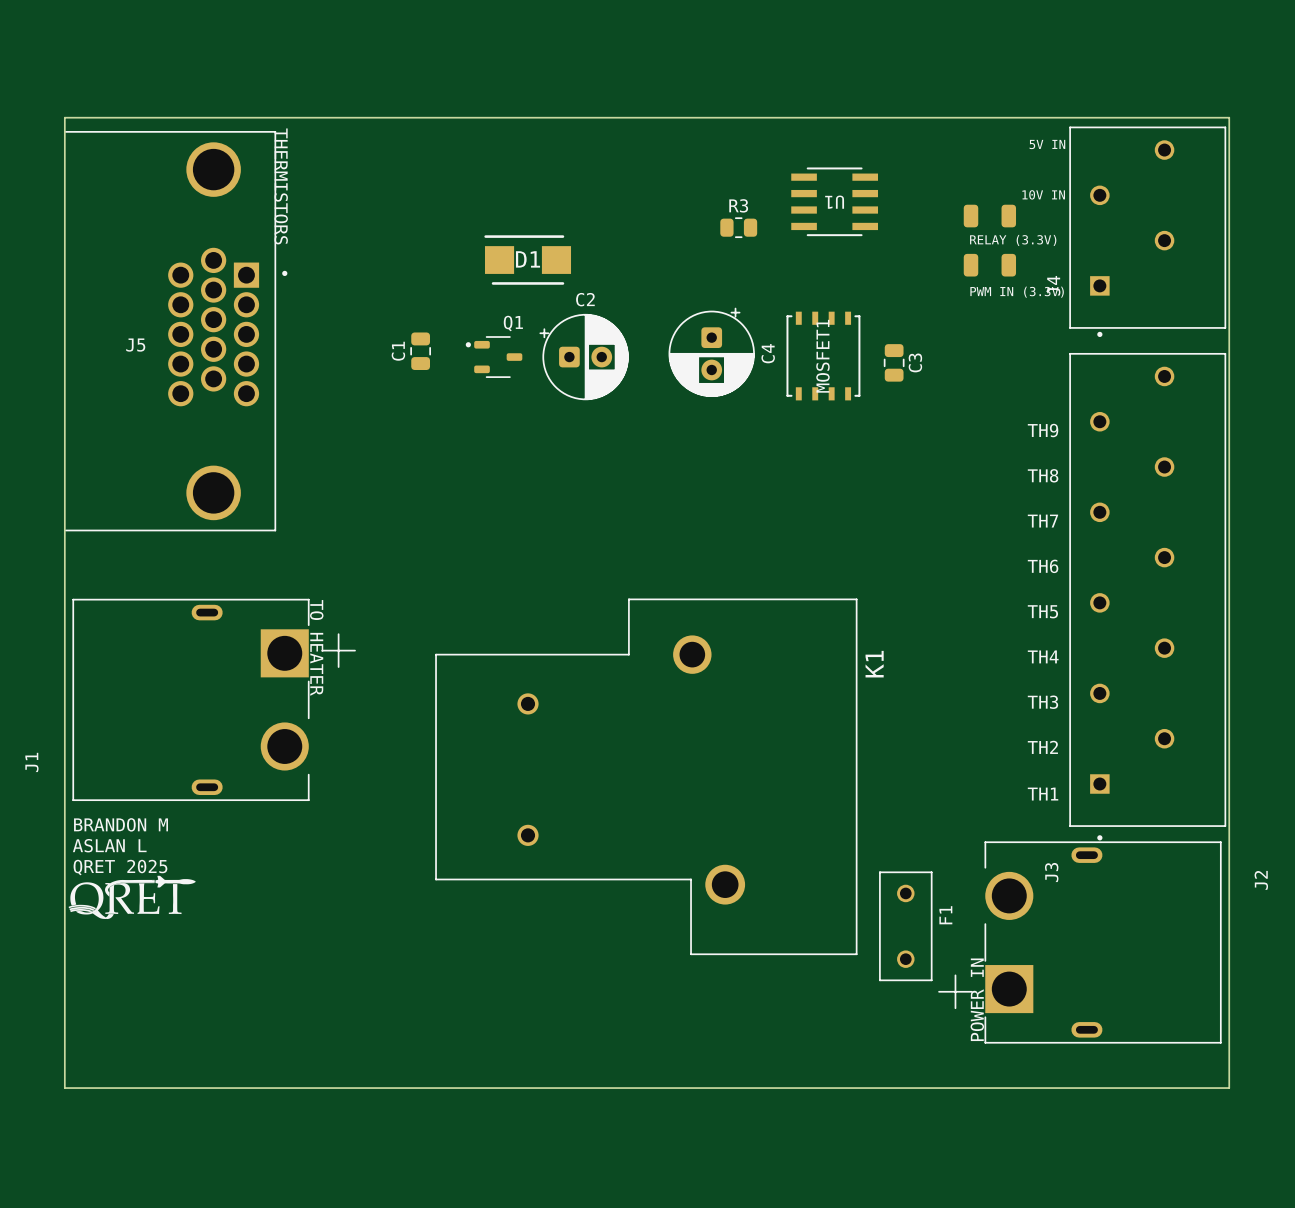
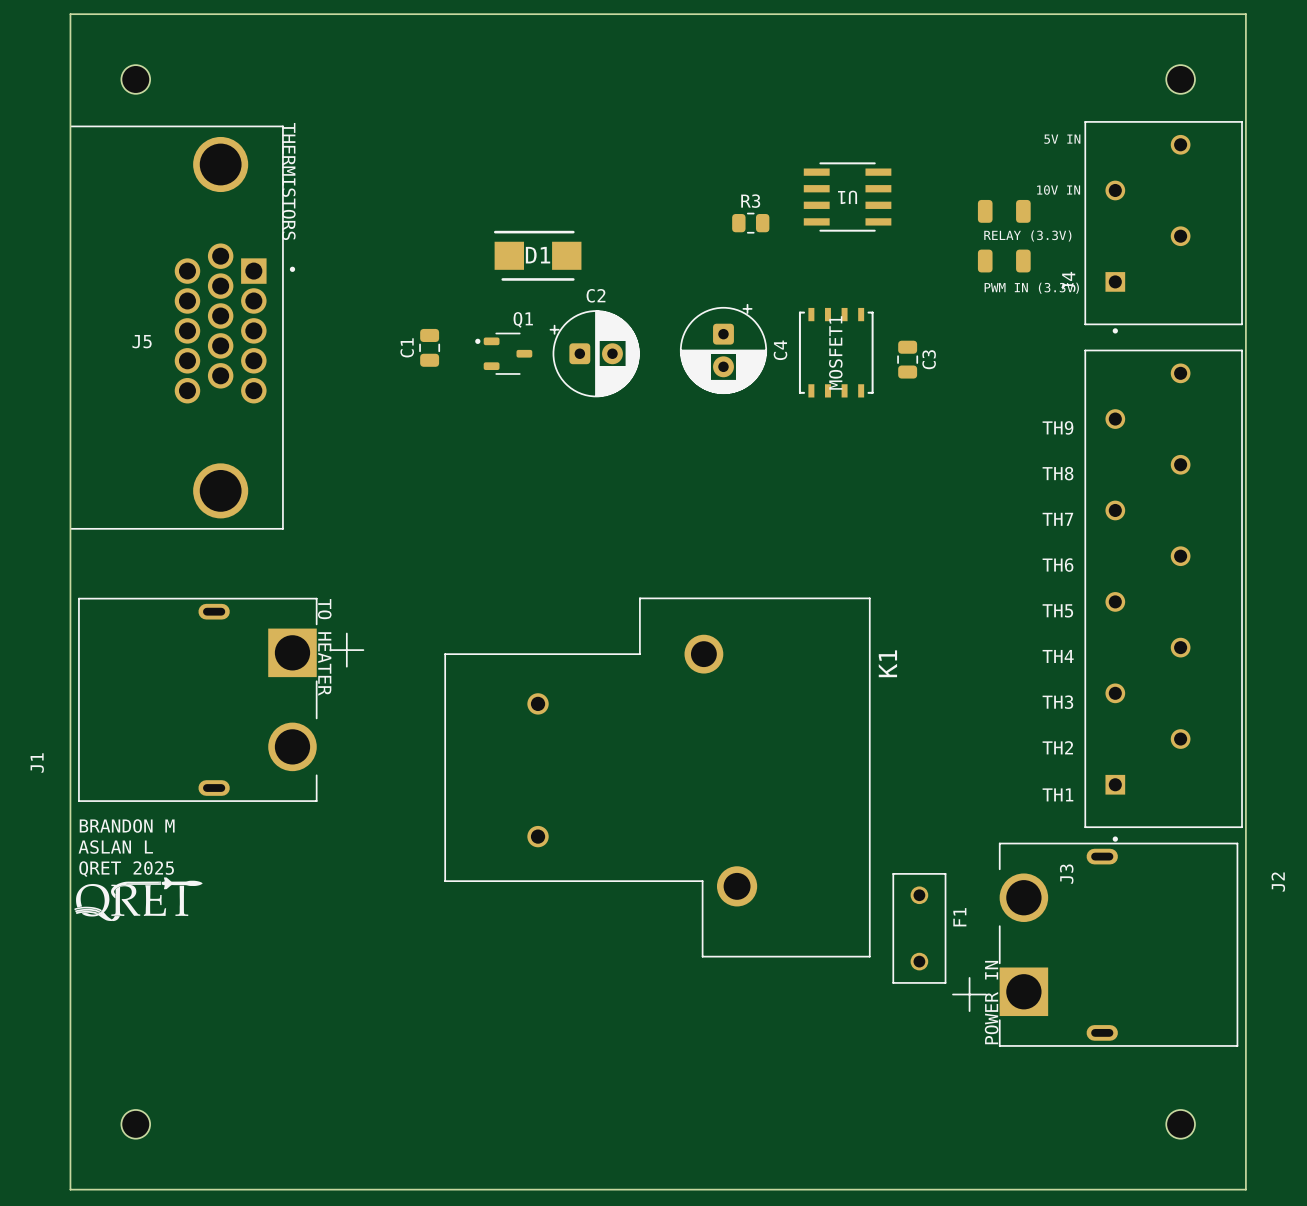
part: none -> (135, 79)
part: none -> (1180, 79)
board edge: (64, 117) (1229, 117) -> (70, 112) (70, 14) (1245, 14) (1245, 112)
board edge: (64, 1088) (1229, 1088) -> (70, 1091) (70, 1189) (1245, 1189) (1245, 1091)
part: none -> (135, 1124)
part: none -> (1180, 1124)

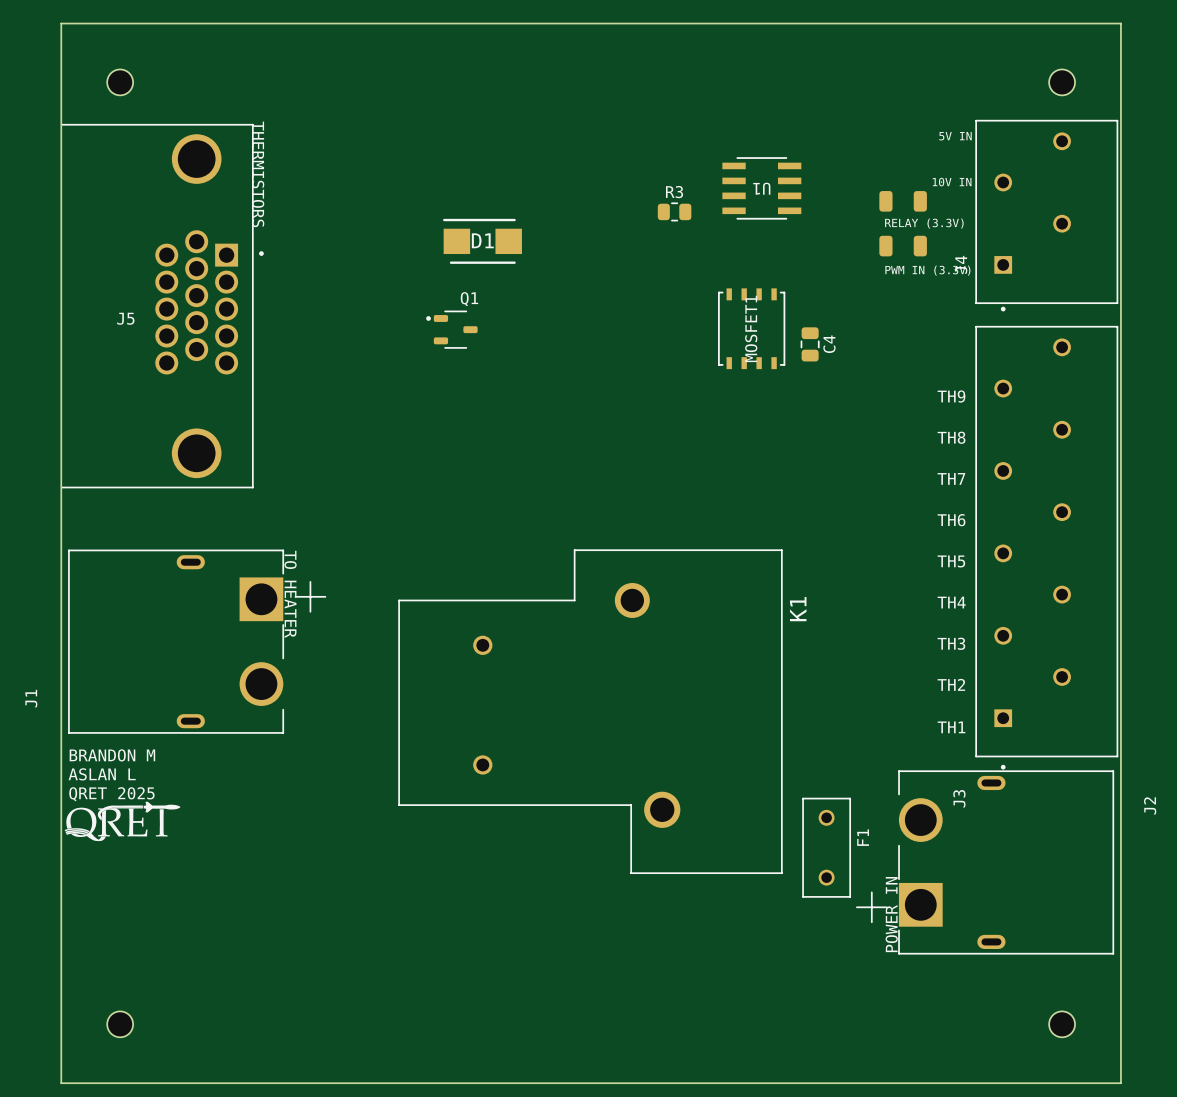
C4 footprint: [680, 303, 767, 394] -> [800, 327, 820, 362]
C1: (429, 347) -> none
C4 name position: C4 (780, 350) -> C4 (829, 344)
C2: (594, 353) -> none
C3: (907, 359) -> none

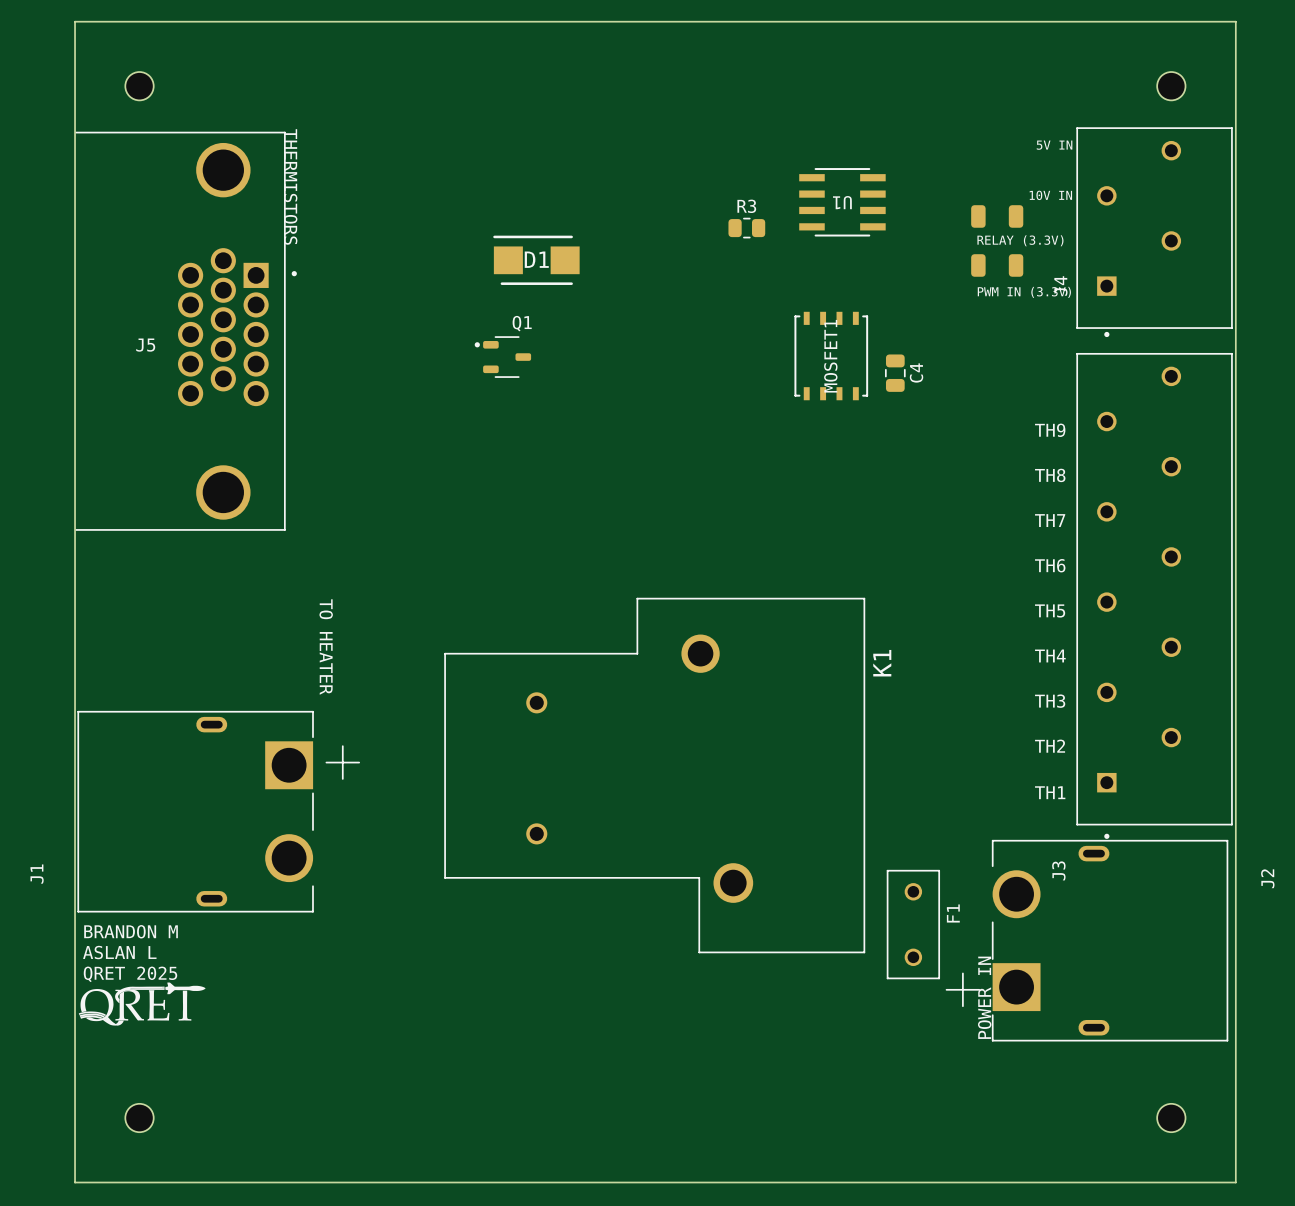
J1 position: (197, 641) -> (218, 811)
text position: BRANDON M (112, 755) -> BRANDON M (131, 931)
text position: ASLAN L (102, 774) -> ASLAN L (119, 952)
text position: QRET 2025 (111, 794) -> QRET 2025 (130, 974)
drawing position: (122, 821) -> (142, 1004)

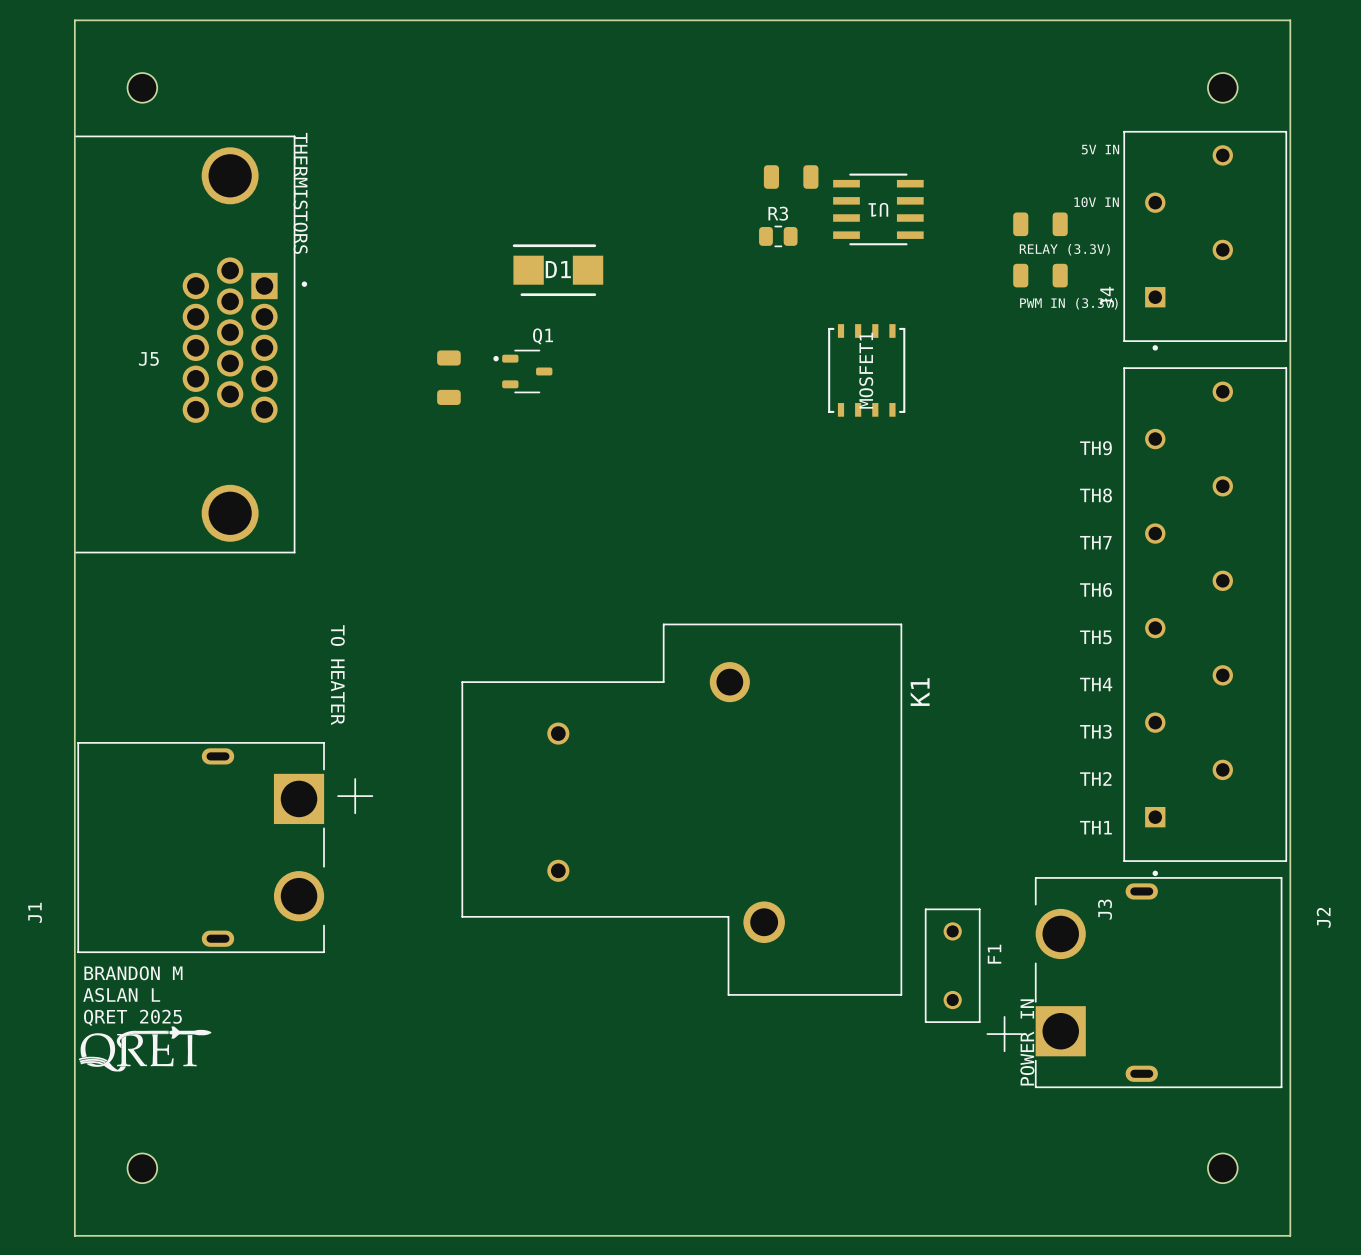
part: none -> (791, 177)
part: none -> (448, 377)
C4: (895, 373) -> none

